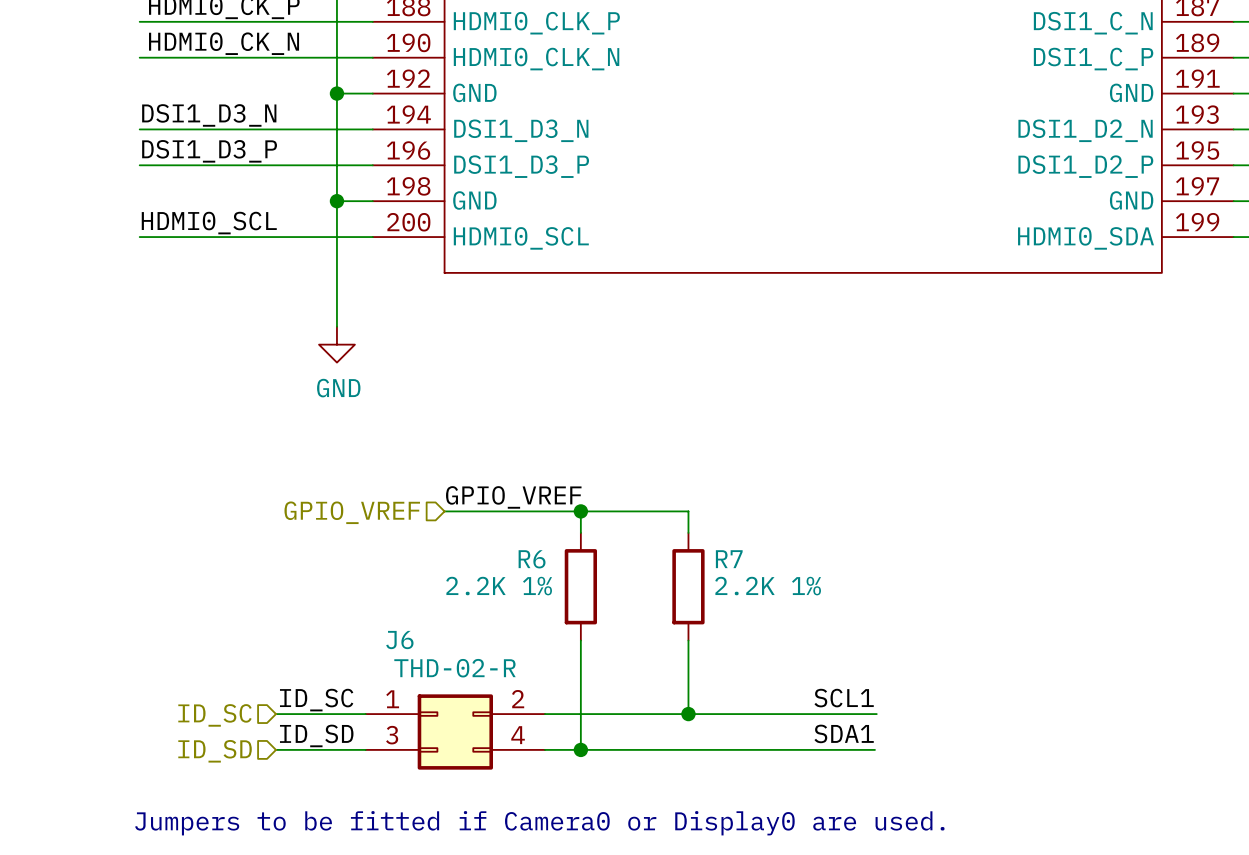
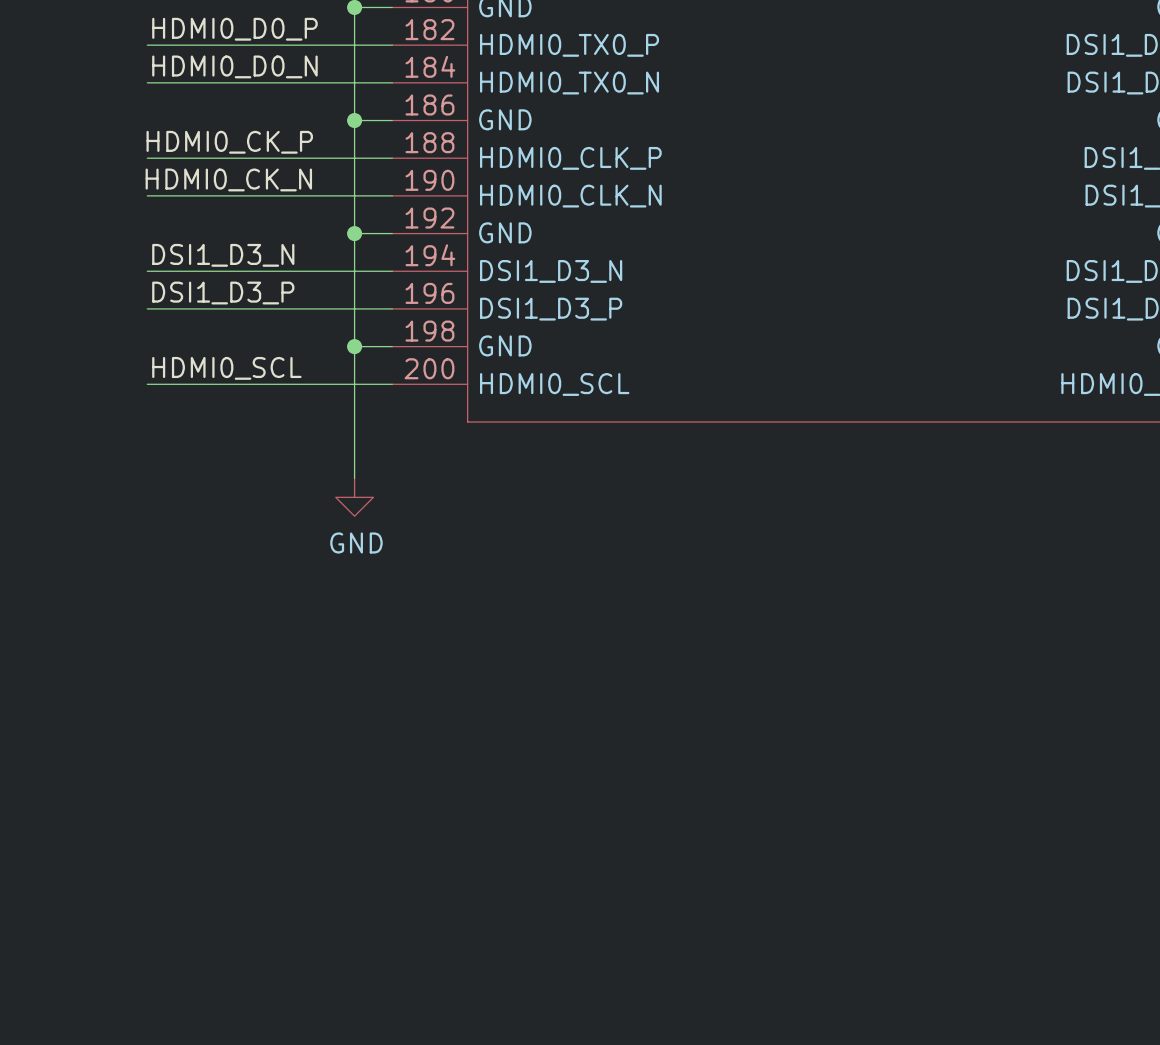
label: GPIO_VREF (513, 497) -> none
wire: (444, 511) (688, 511) (688, 532) -> none
wire: (580, 511) (580, 532) -> none
junction: (580, 511) -> none
hierarchical label: GPIO_VREF (352, 512) -> none
R6: 2.2K 1% (580, 586) -> none
R7: 2.2K 1% (688, 586) -> none
wire: (580, 640) (580, 749) -> none
wire: (688, 640) (688, 714) -> none
label: SCL1 (844, 698) -> none
label: ID_SC (316, 700) -> none
wire: (276, 714) (365, 714) -> none
wire: (545, 714) (876, 714) -> none
junction: (688, 714) -> none
hierarchical label: ID_SC (214, 715) -> none
J6: THD-02-R (455, 732) -> none
label: SDA1 (844, 733) -> none
label: ID_SD (316, 735) -> none
wire: (276, 749) (365, 749) -> none
wire: (545, 749) (874, 749) -> none
junction: (580, 749) -> none
hierarchical label: ID_SD (215, 751) -> none
text: Jumpers to be fitted if Camera0 or Display0 are used. (539, 823) -> none

